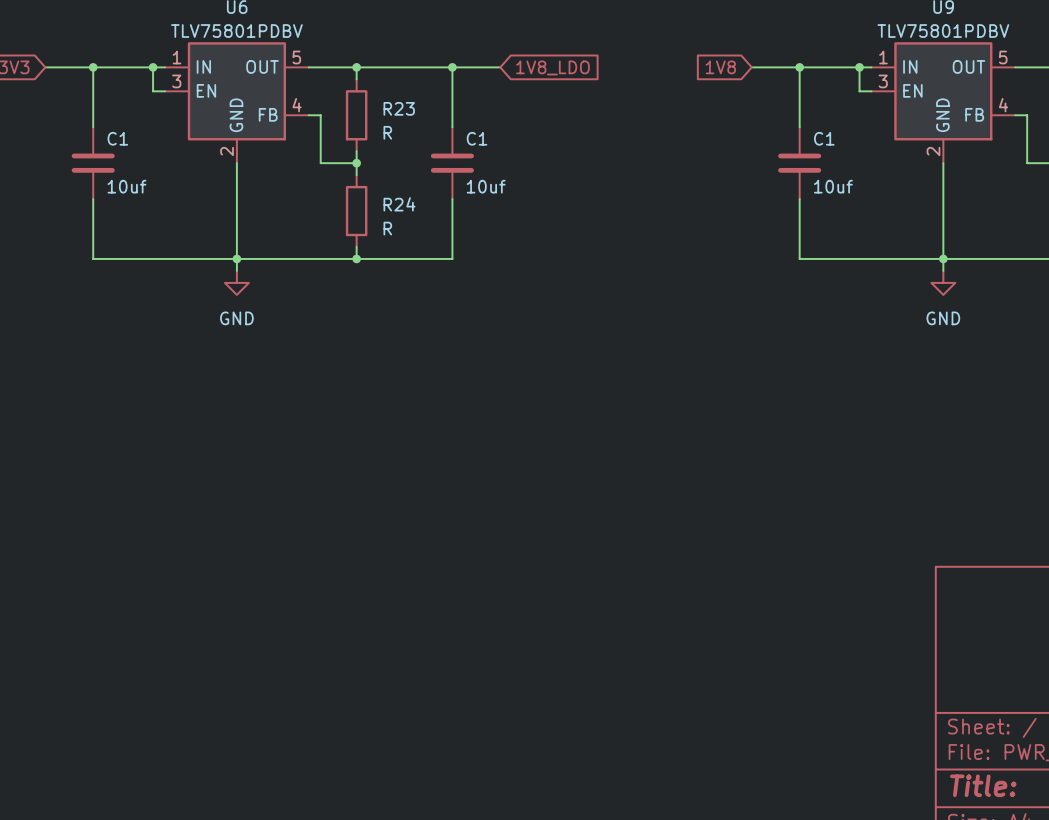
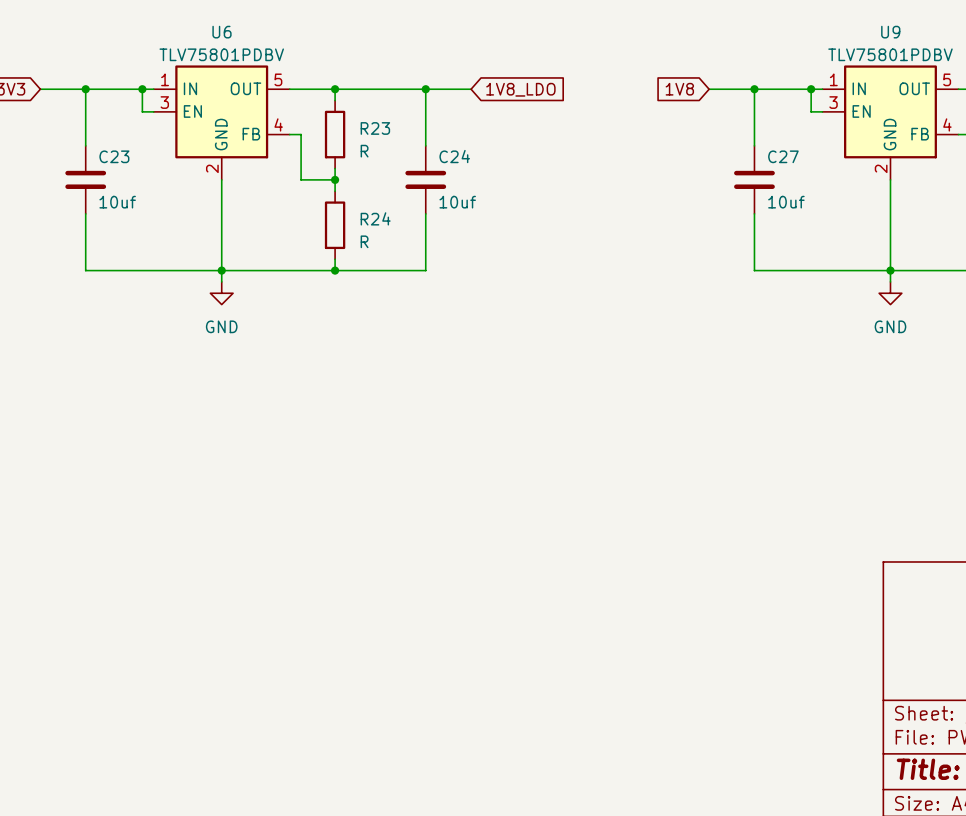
C1 name: C1 (117, 138) -> C23 (114, 156)
C1 name: C1 (477, 138) -> C24 (454, 156)
C1 name: C1 (824, 138) -> C27 (783, 156)

